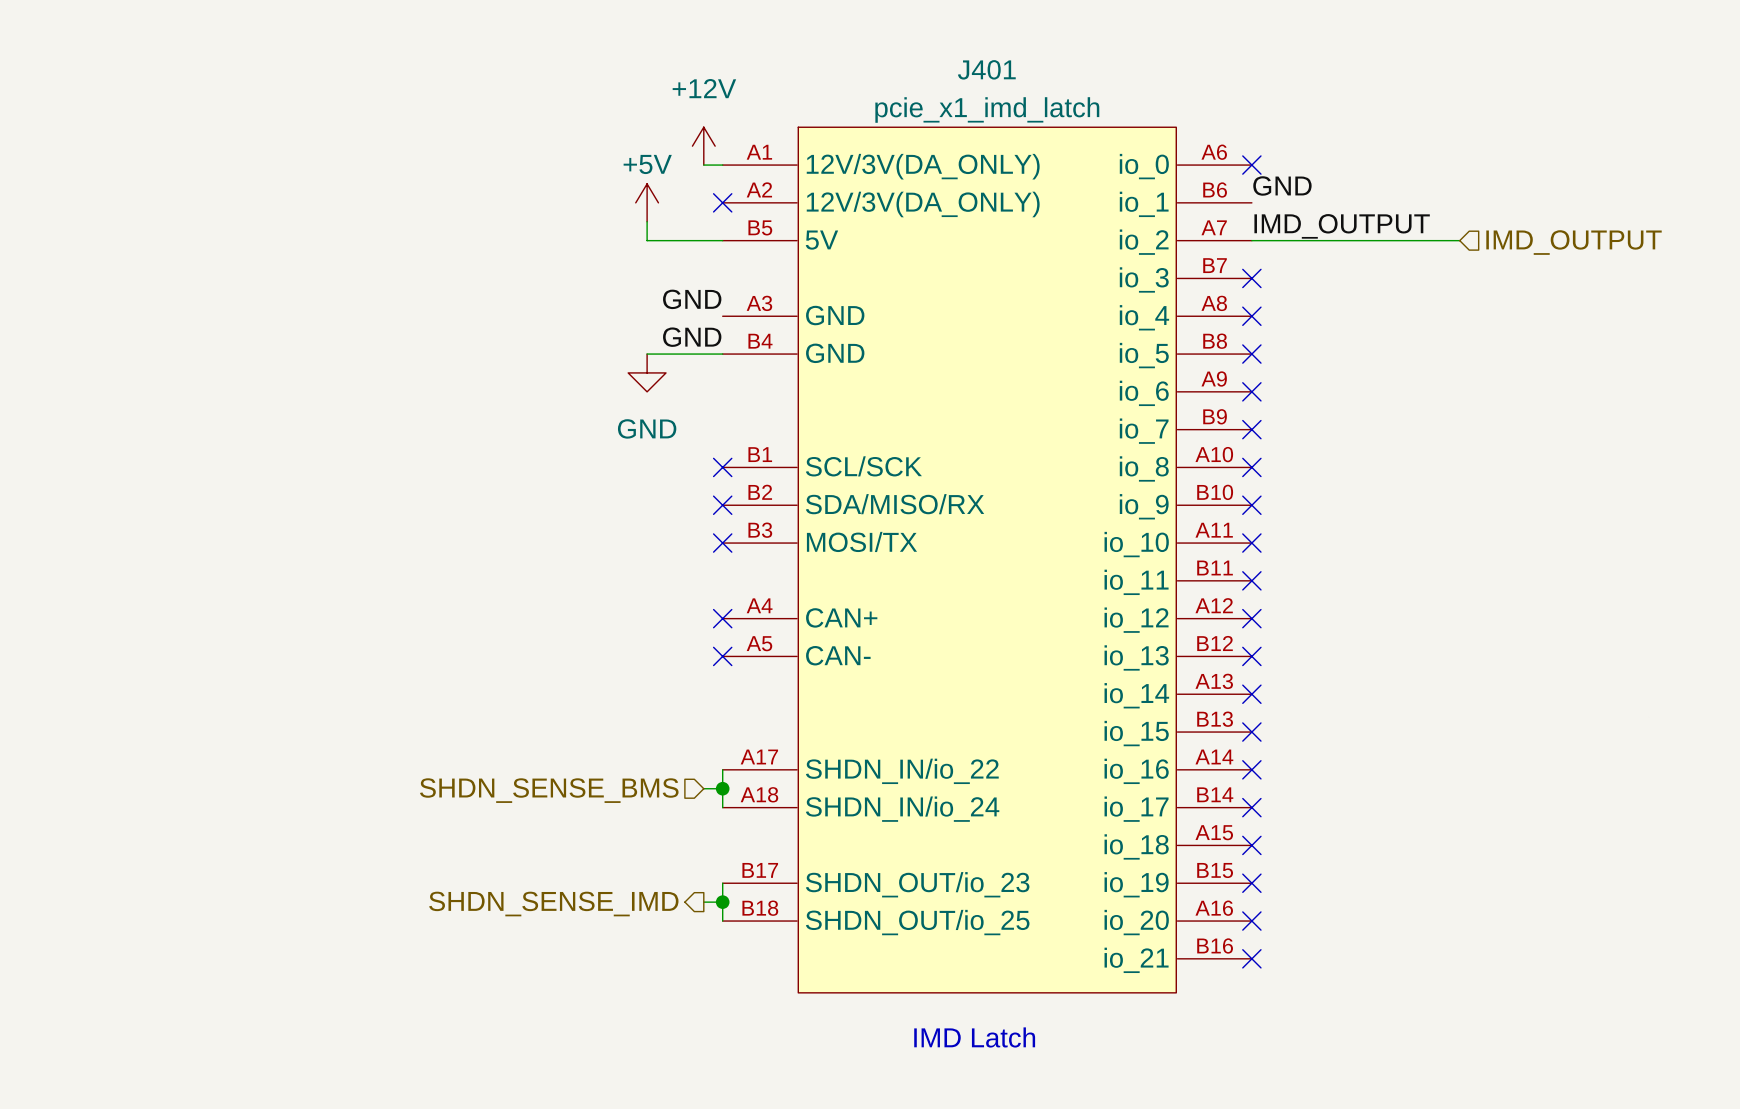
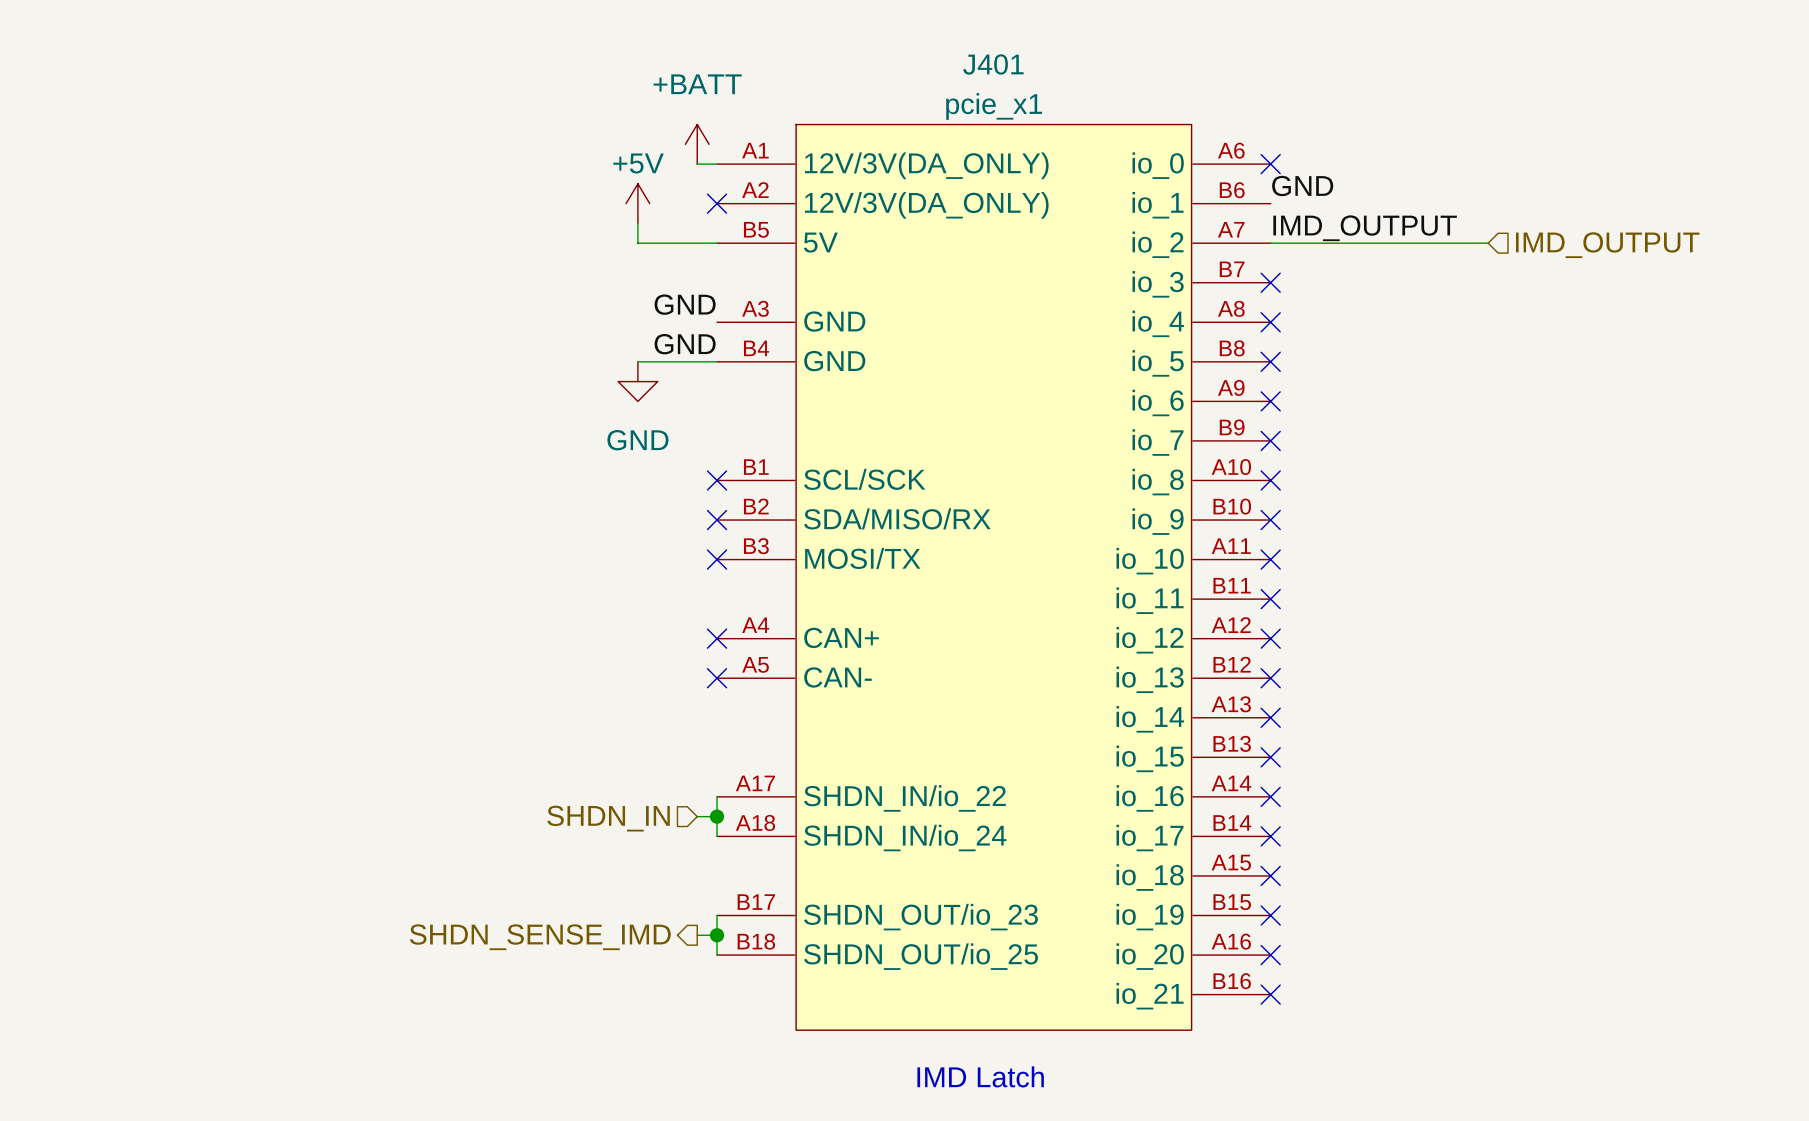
J401 value: pcie_x1_imd_latch (987, 109) -> pcie_x1 (994, 106)
power symbol: +12V (703, 146) -> +BATT (697, 144)
hierarchical label: SHDN_SENSE_BMS (549, 790) -> SHDN_IN (608, 818)

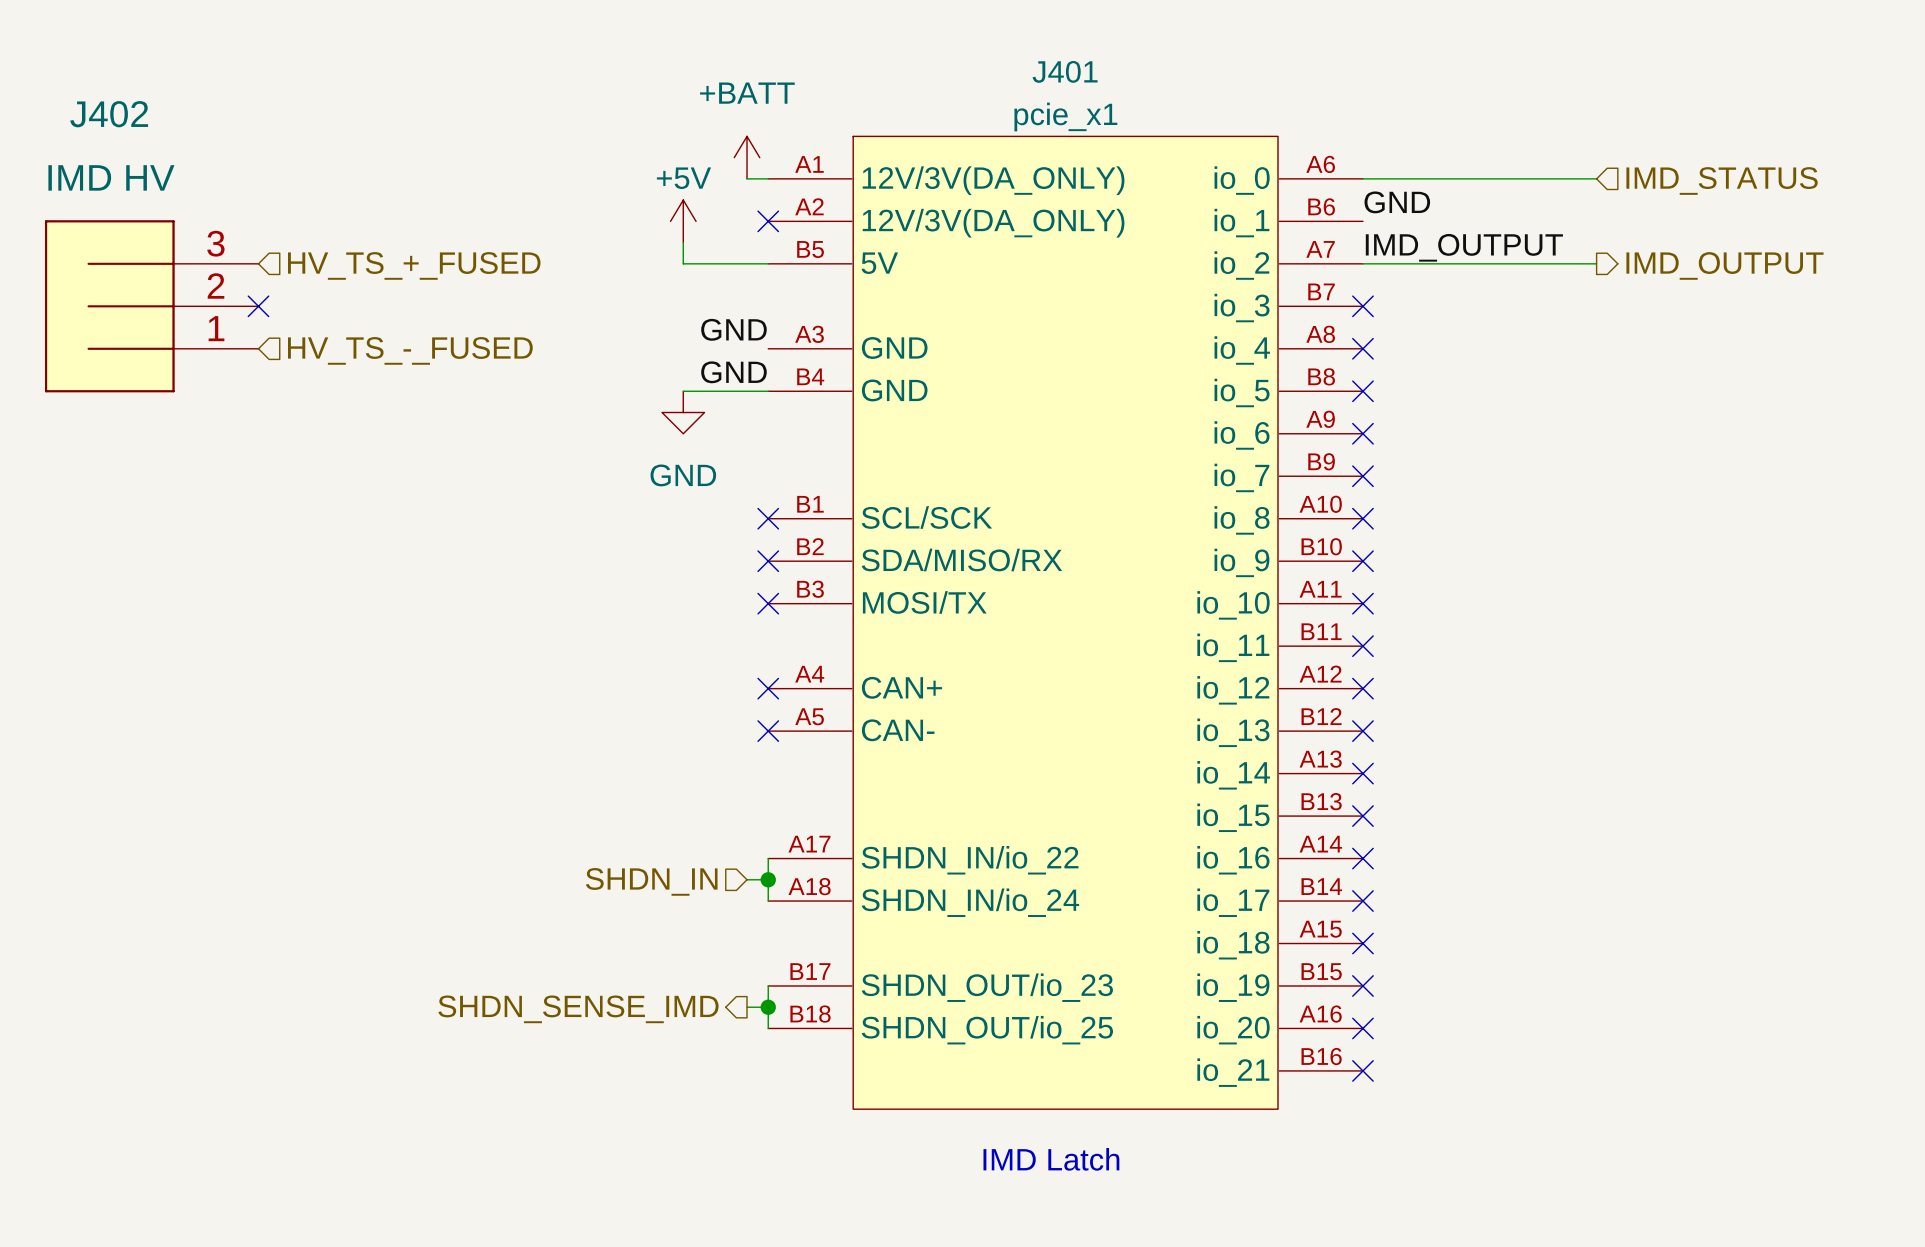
wire: none -> (1362, 178) (1596, 178)
no-connect mark: (1270, 164) -> none
hierarchical label: none -> IMD_STATUS (1722, 180)
hierarchical label: none -> HV_TS_+_FUSED (414, 265)
hierarchical label shape: input (1607, 245) -> output (1724, 265)
J402: none -> IMD HV (151, 306)
no-connect mark: none -> (258, 306)
hierarchical label: none -> HV_TS_-_FUSED (410, 350)

